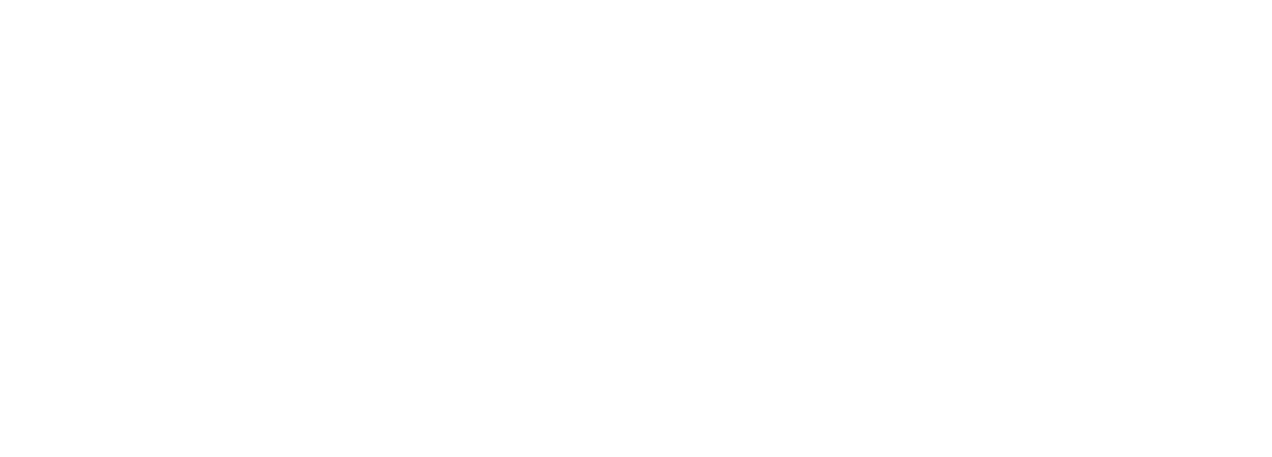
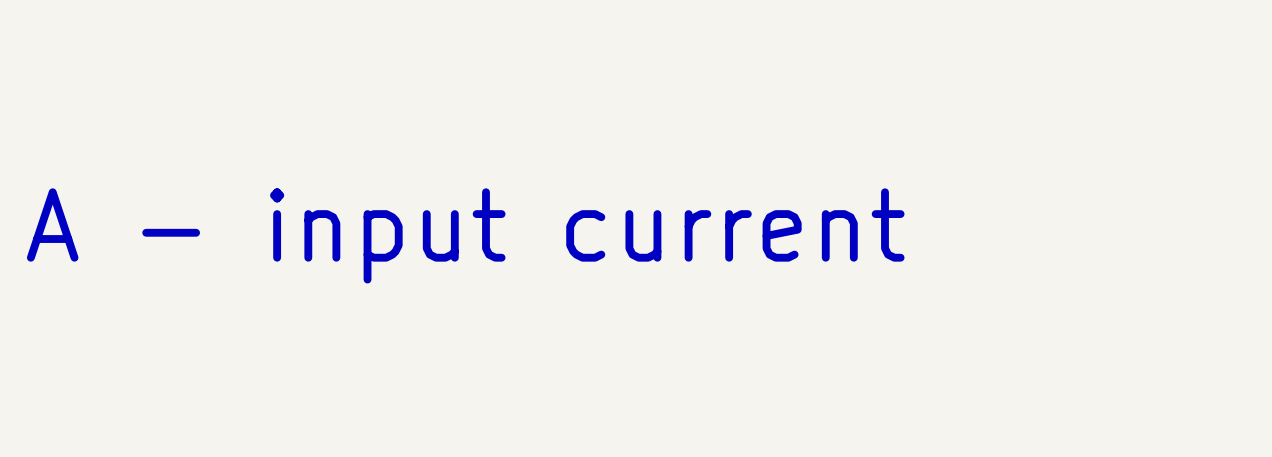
text: none -> A - input current (465, 235)

